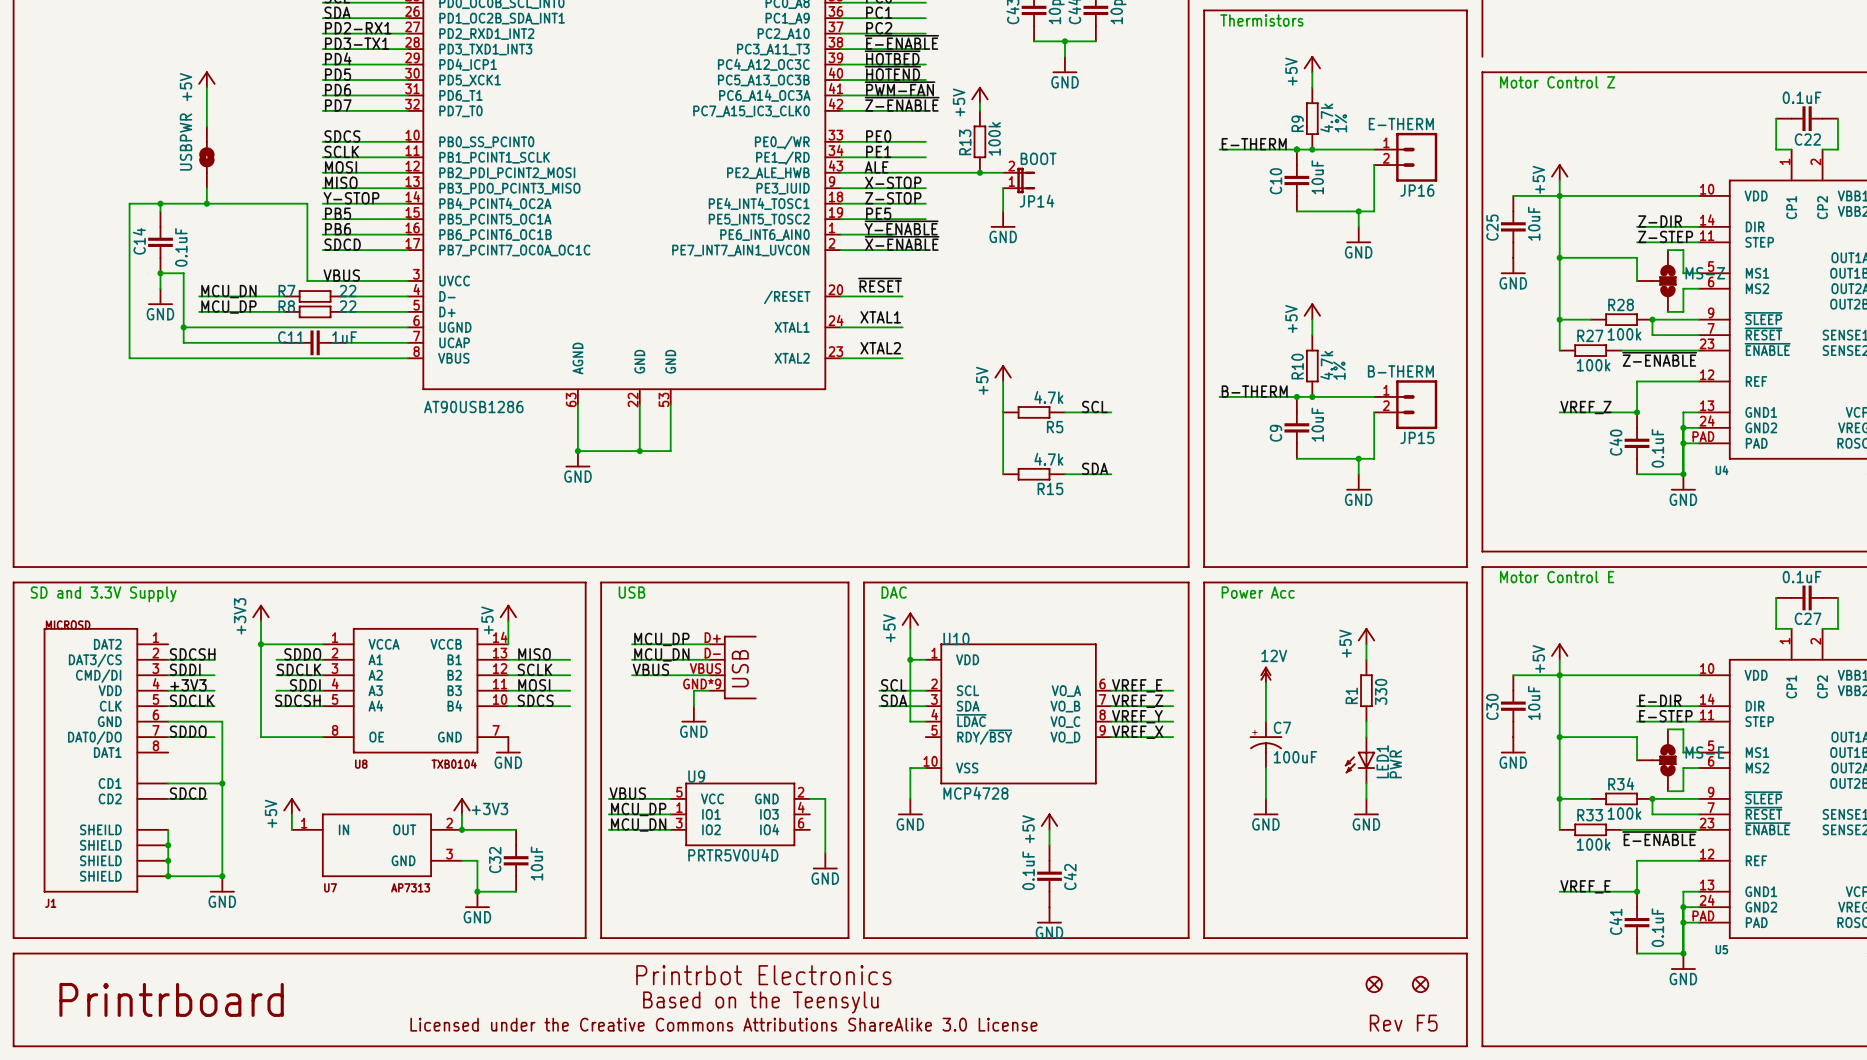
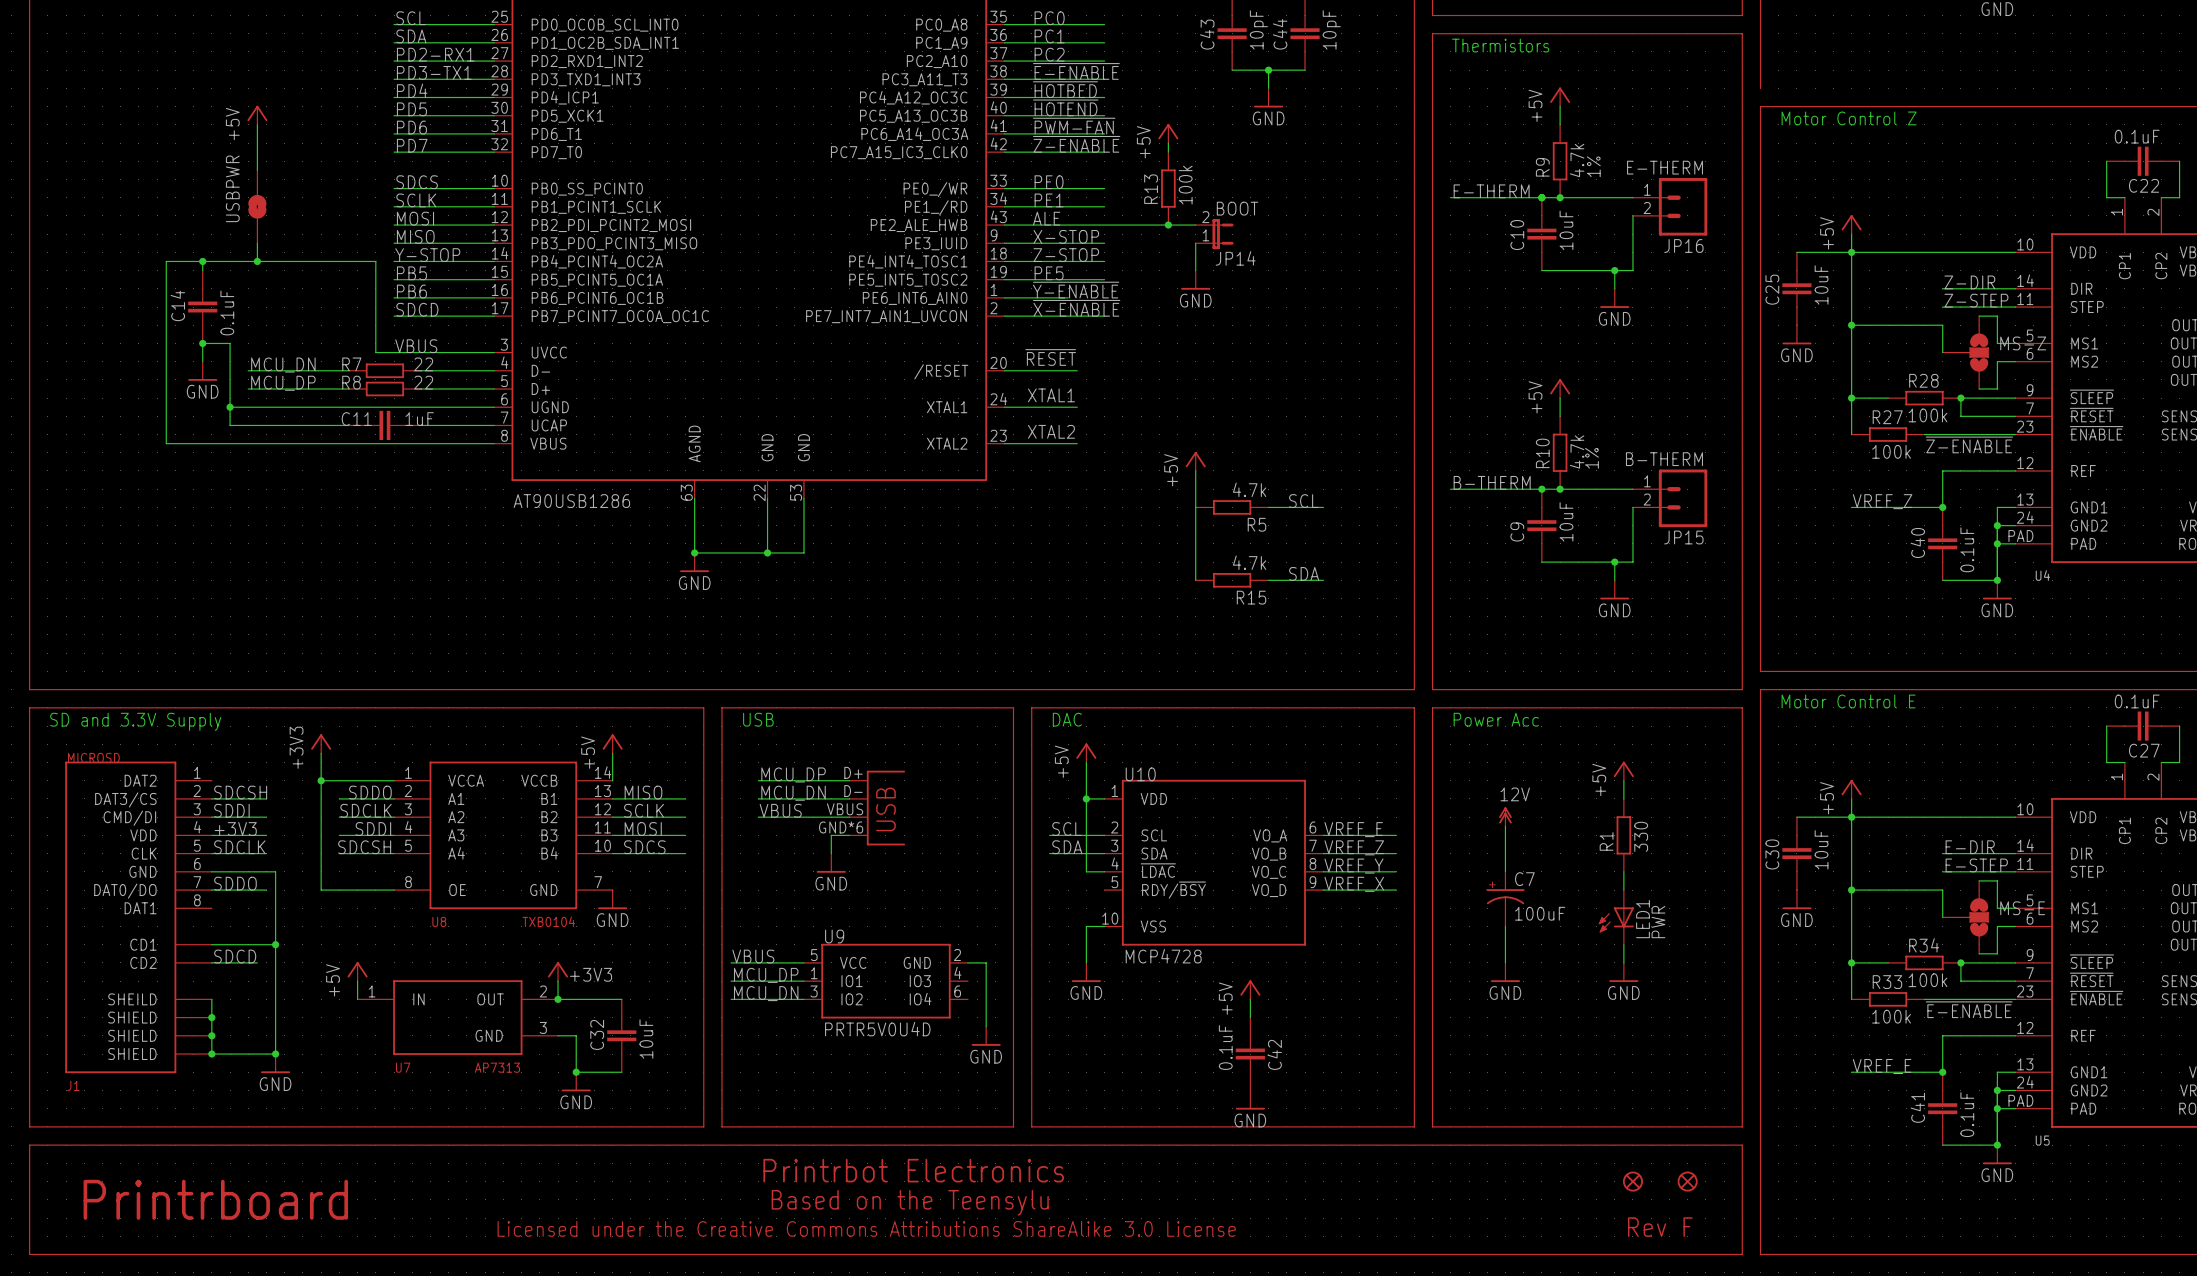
part pin number: GND*9 (702, 684) -> GND*6 (841, 827)
text: Rev F5 (1403, 1023) -> Rev F (1660, 1227)

